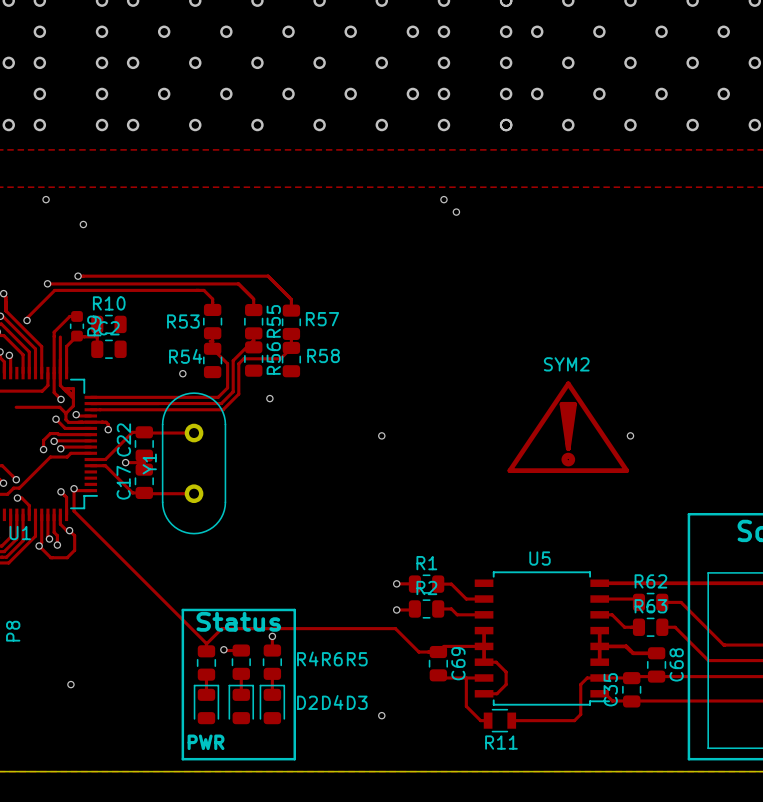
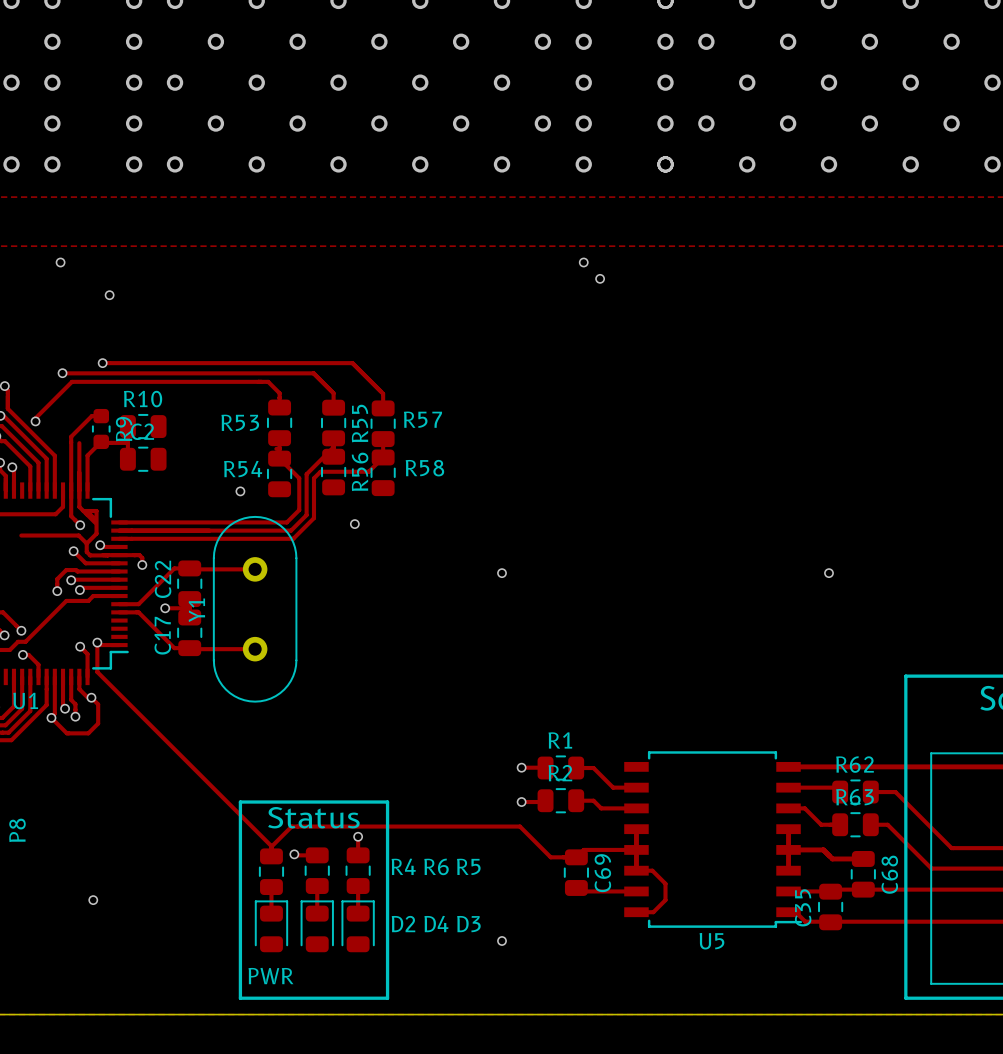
SYM2: (568, 427) -> none
U5 name position: U5 (540, 558) -> U5 (711, 941)
track: (466, 677) (466, 706) (480, 720) (488, 720) -> none
track: (599, 677) (587, 677) (580, 684) (580, 714) (574, 720) (511, 720) -> none
R11: (499, 720) -> none

